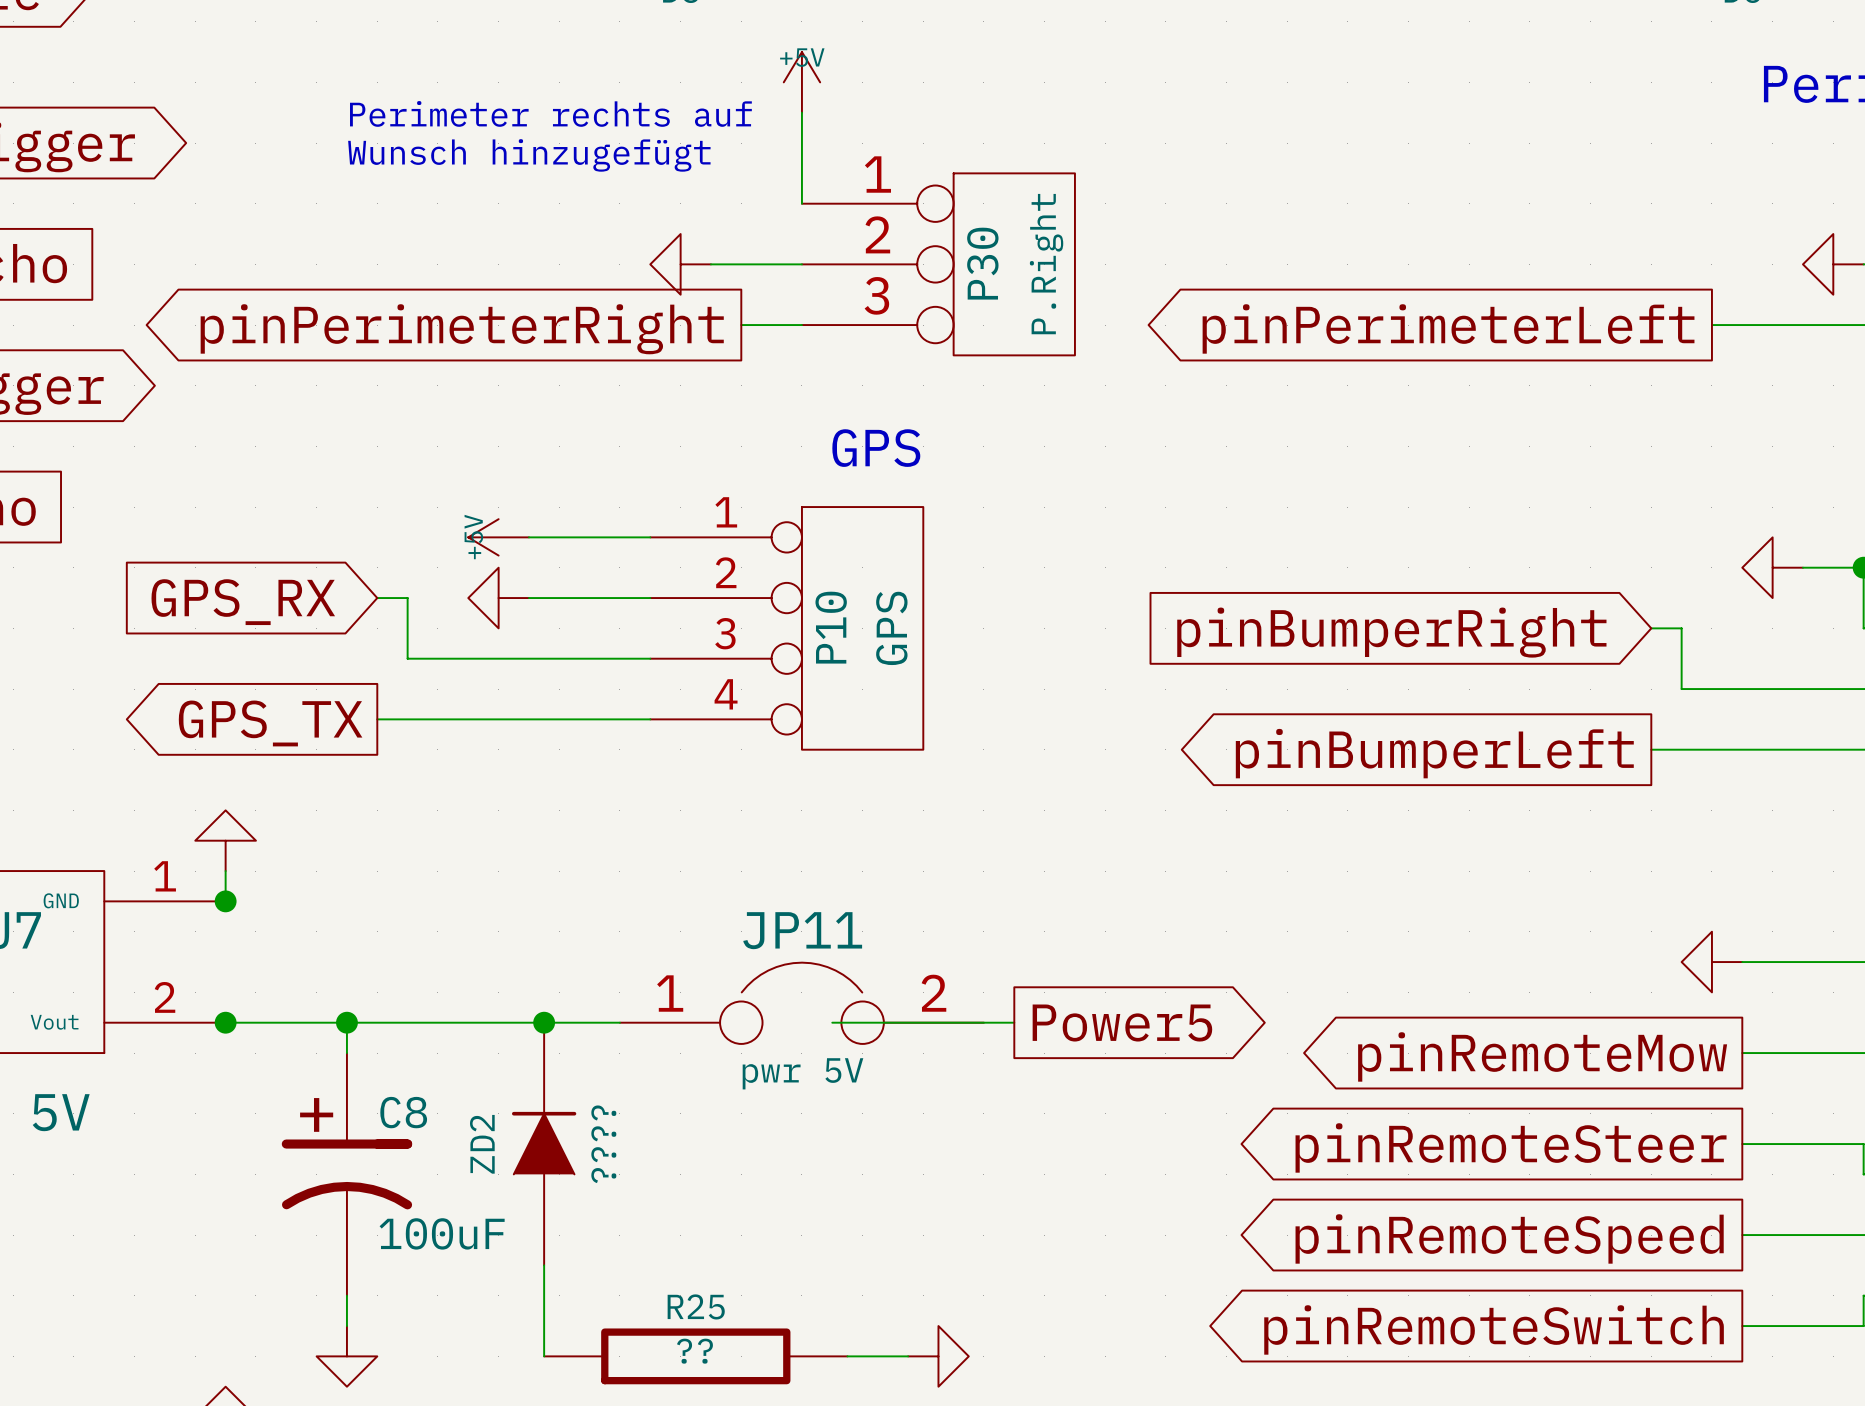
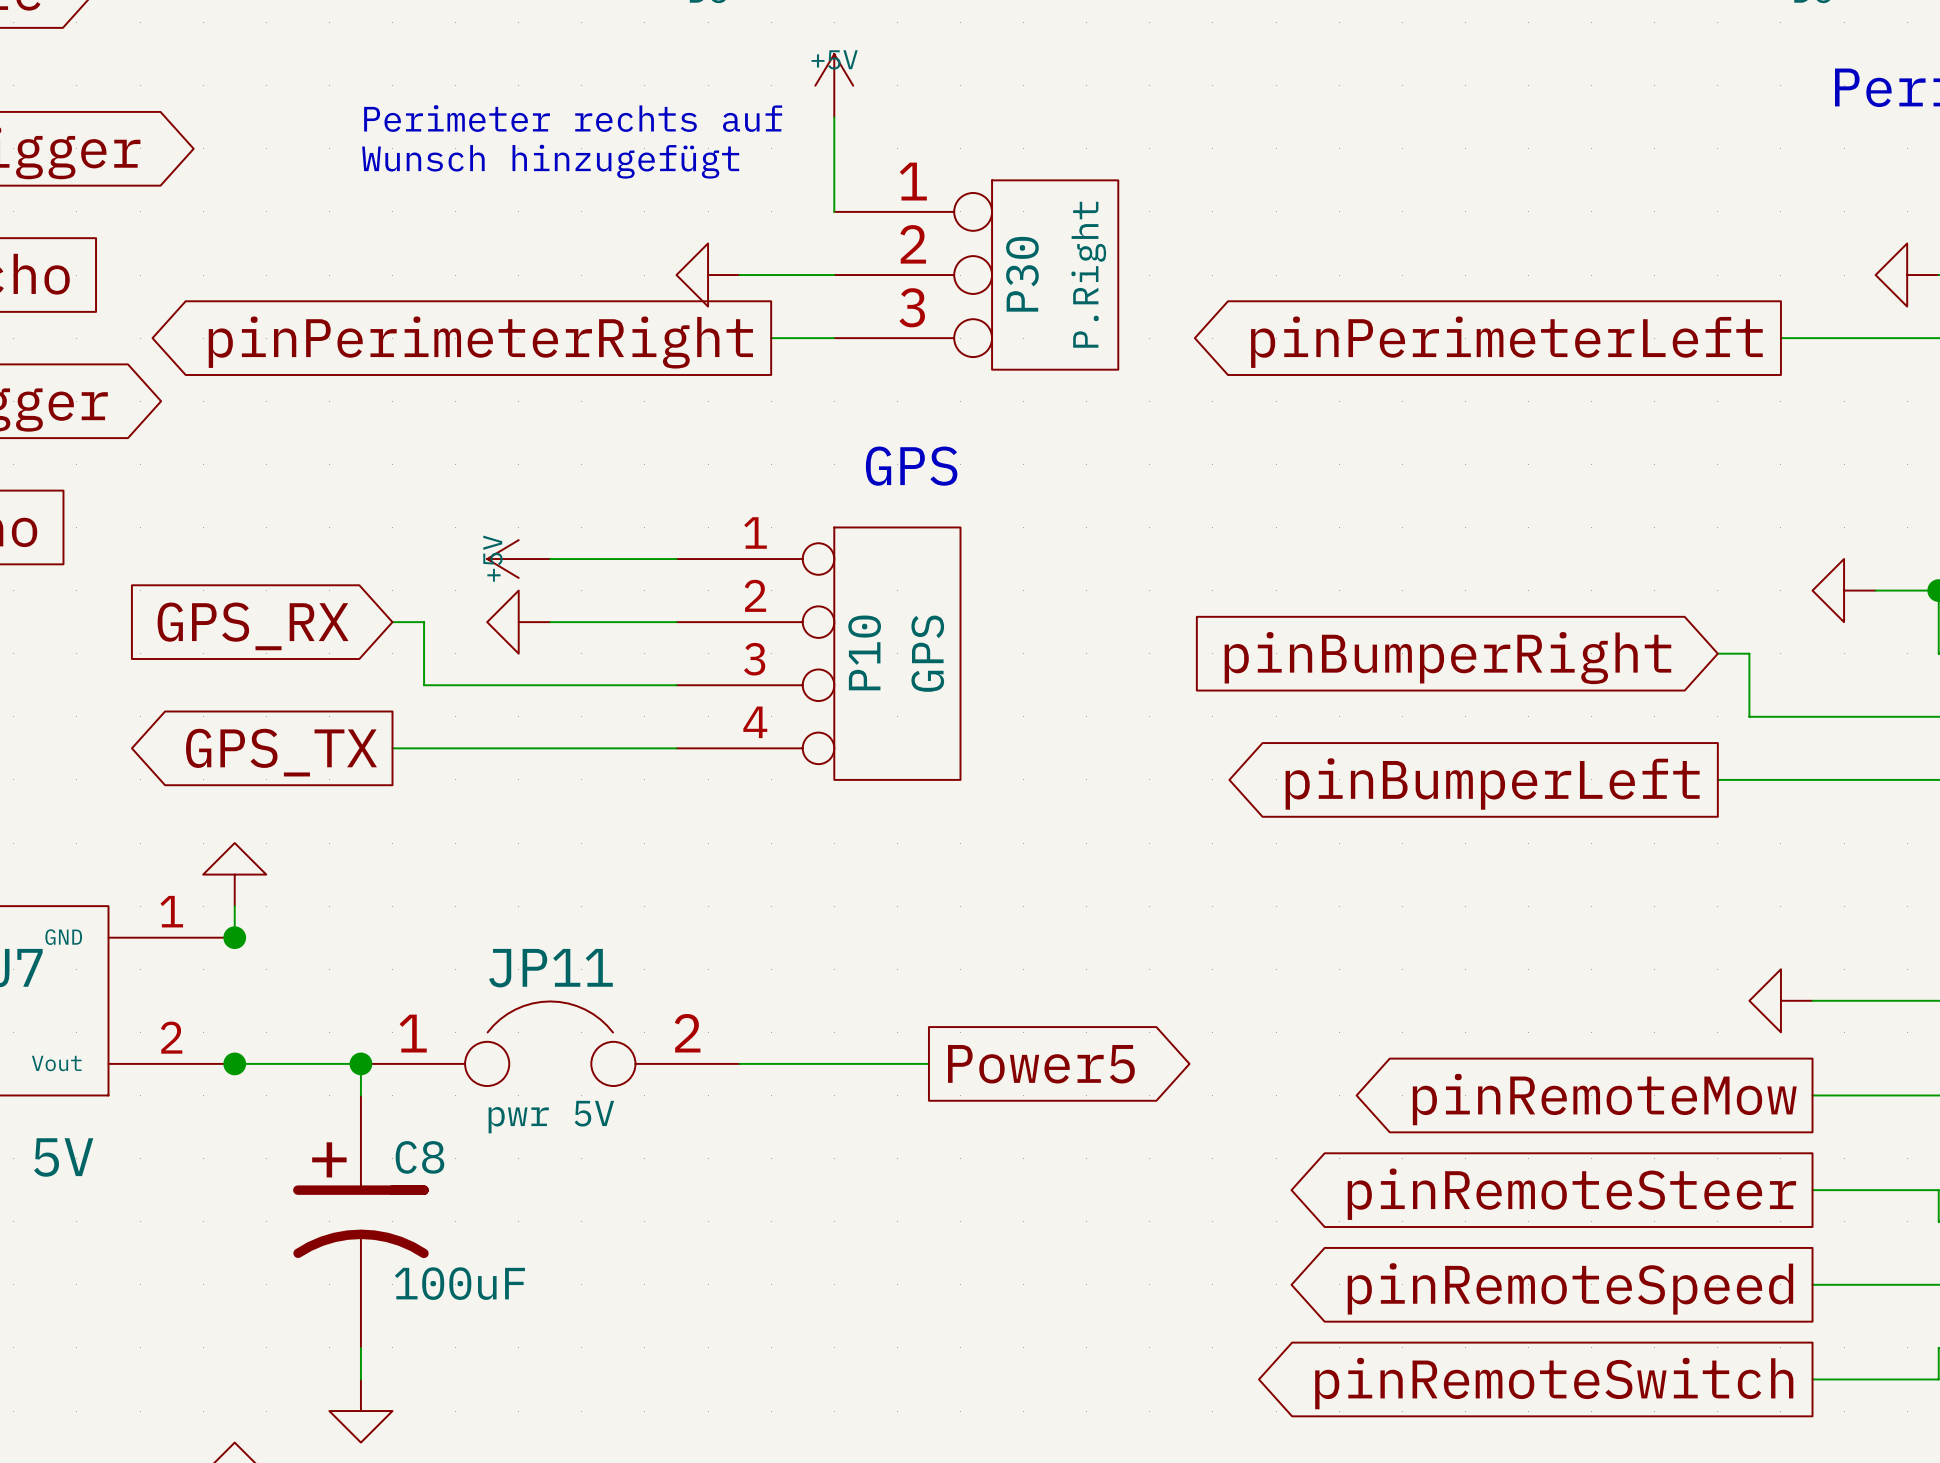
JP11 position: (801, 1003) -> (550, 1043)
wire: (346, 1022) (619, 1022) -> none
junction: (544, 1022) -> none
wire: (892, 1022) (1014, 1022) -> (739, 1063) (865, 1063)
global label position: Power5 (1122, 1023) -> Power5 (1041, 1064)
ZD2: ???? (544, 1144) -> none
wire: (544, 1265) (544, 1356) -> none
R25: ?? (695, 1356) -> none
wire: (847, 1356) (908, 1356) -> none
power symbol: (938, 1356) -> none

